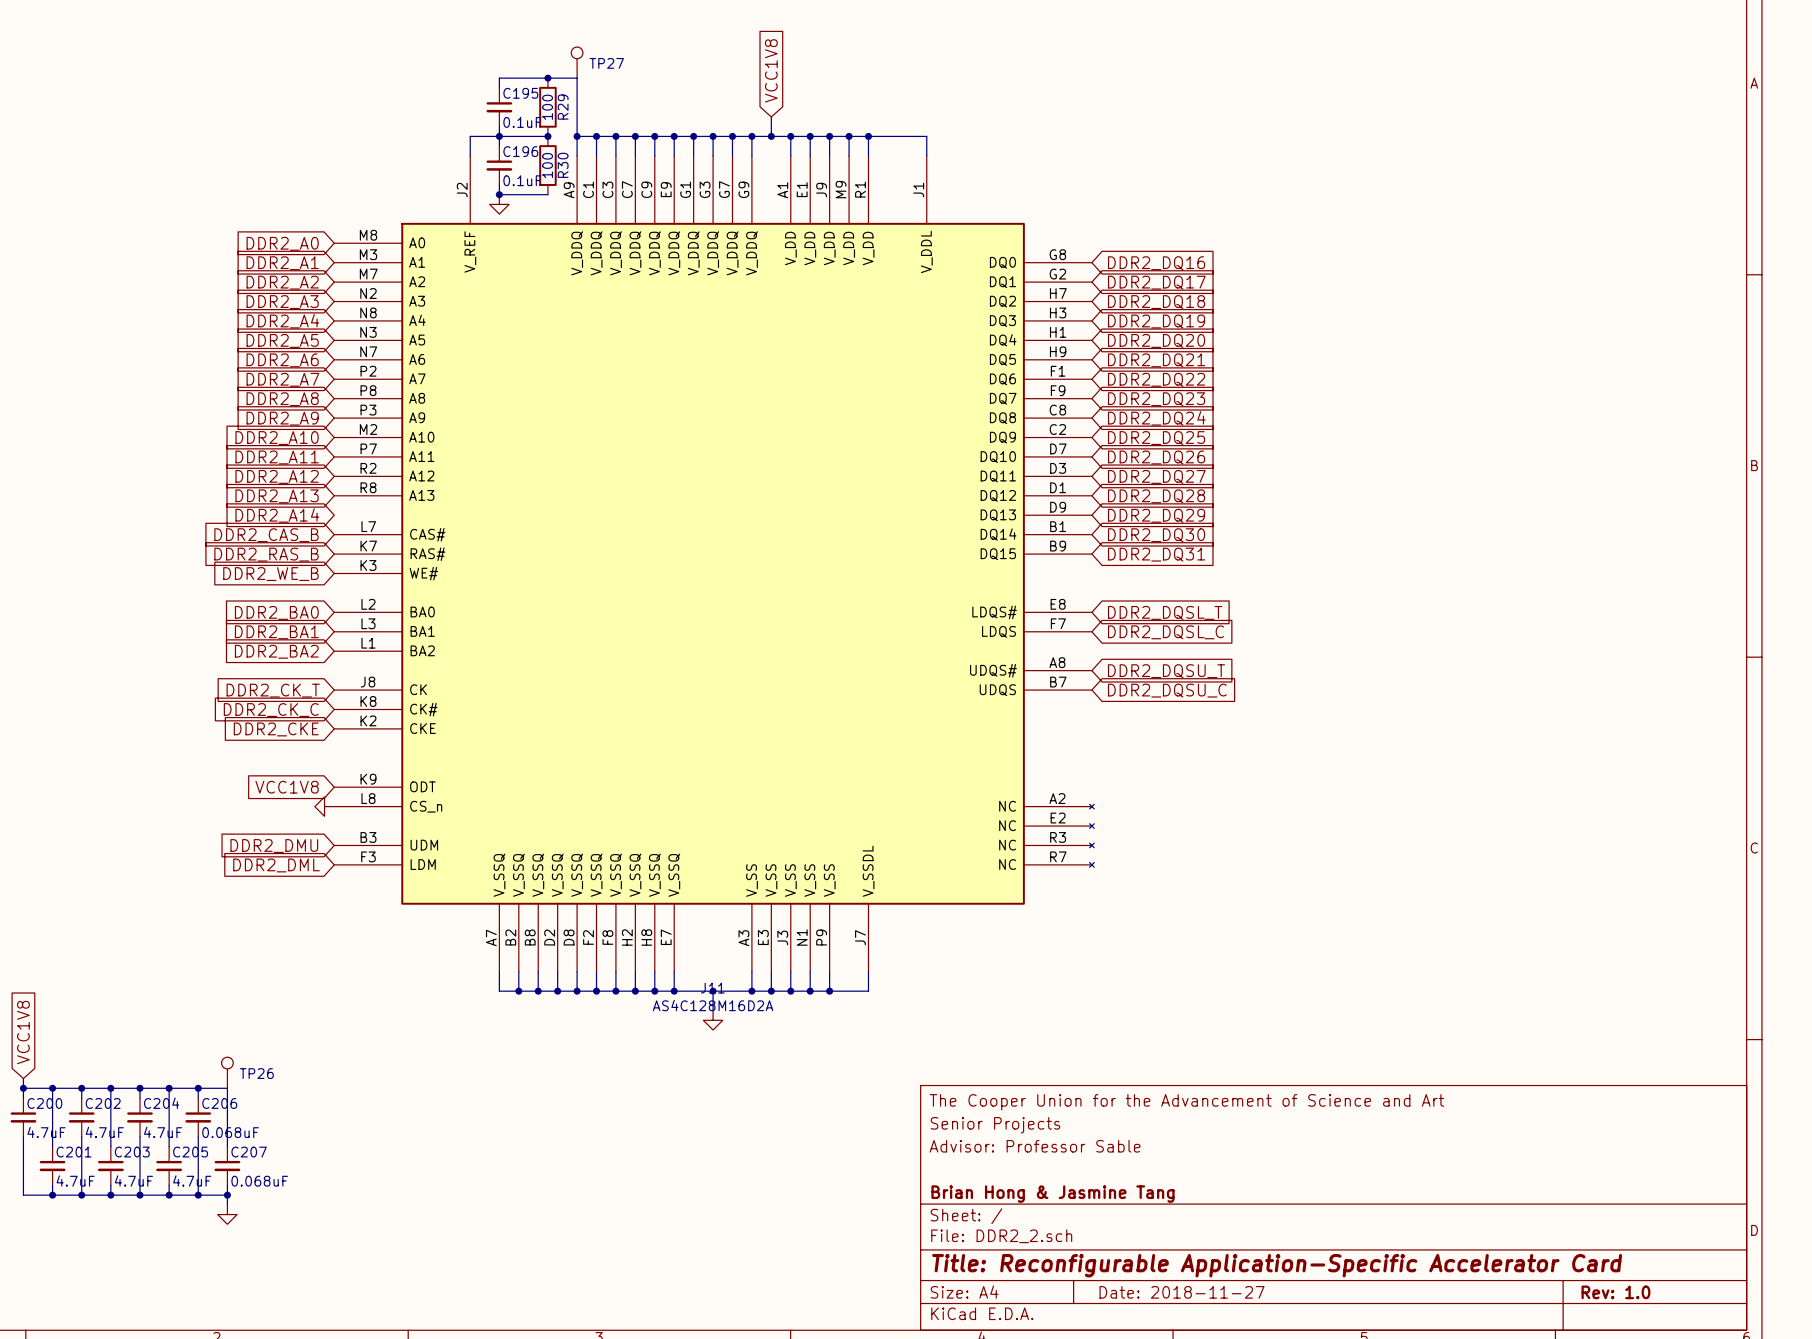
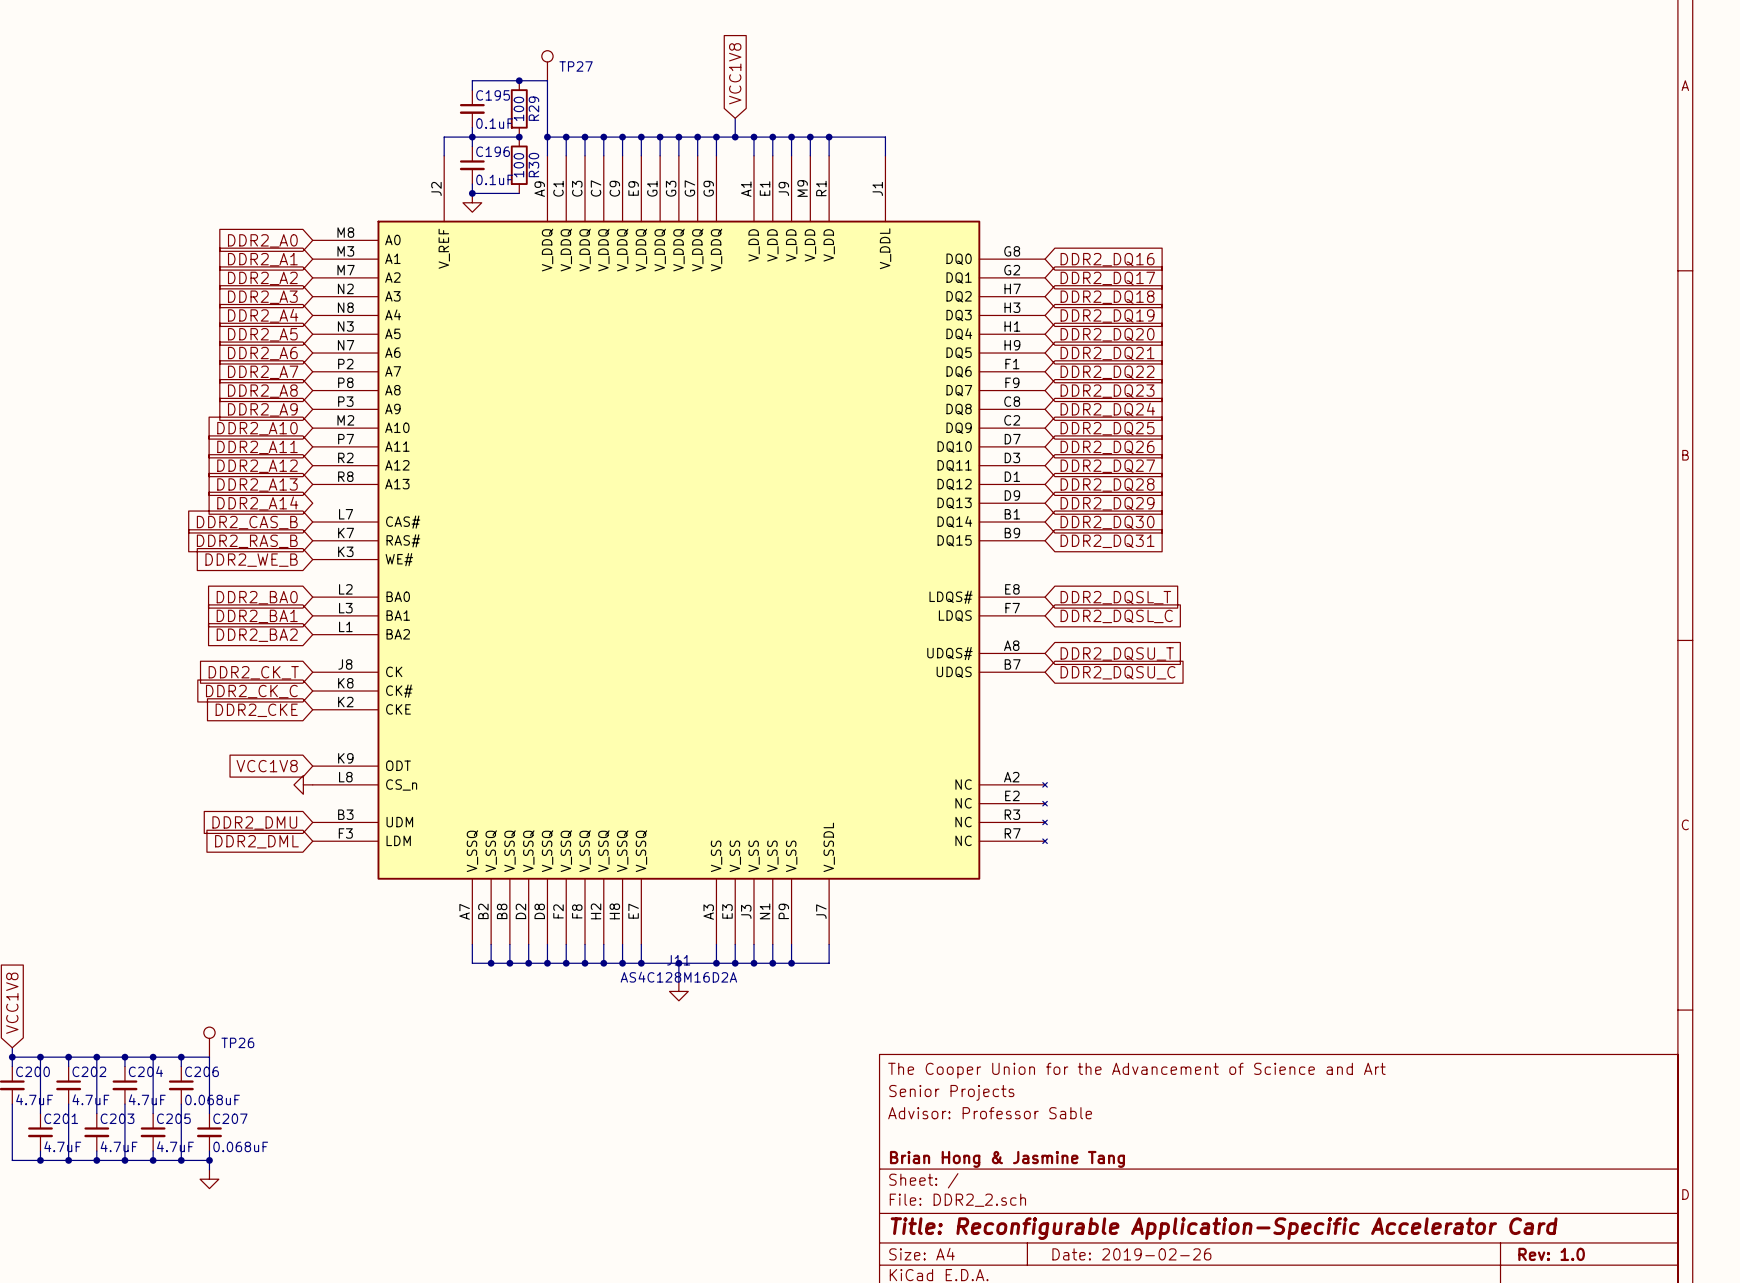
title block: Date: 2018-11-27 (1182, 1292) -> Date: 2019-02-26 (1131, 1254)

